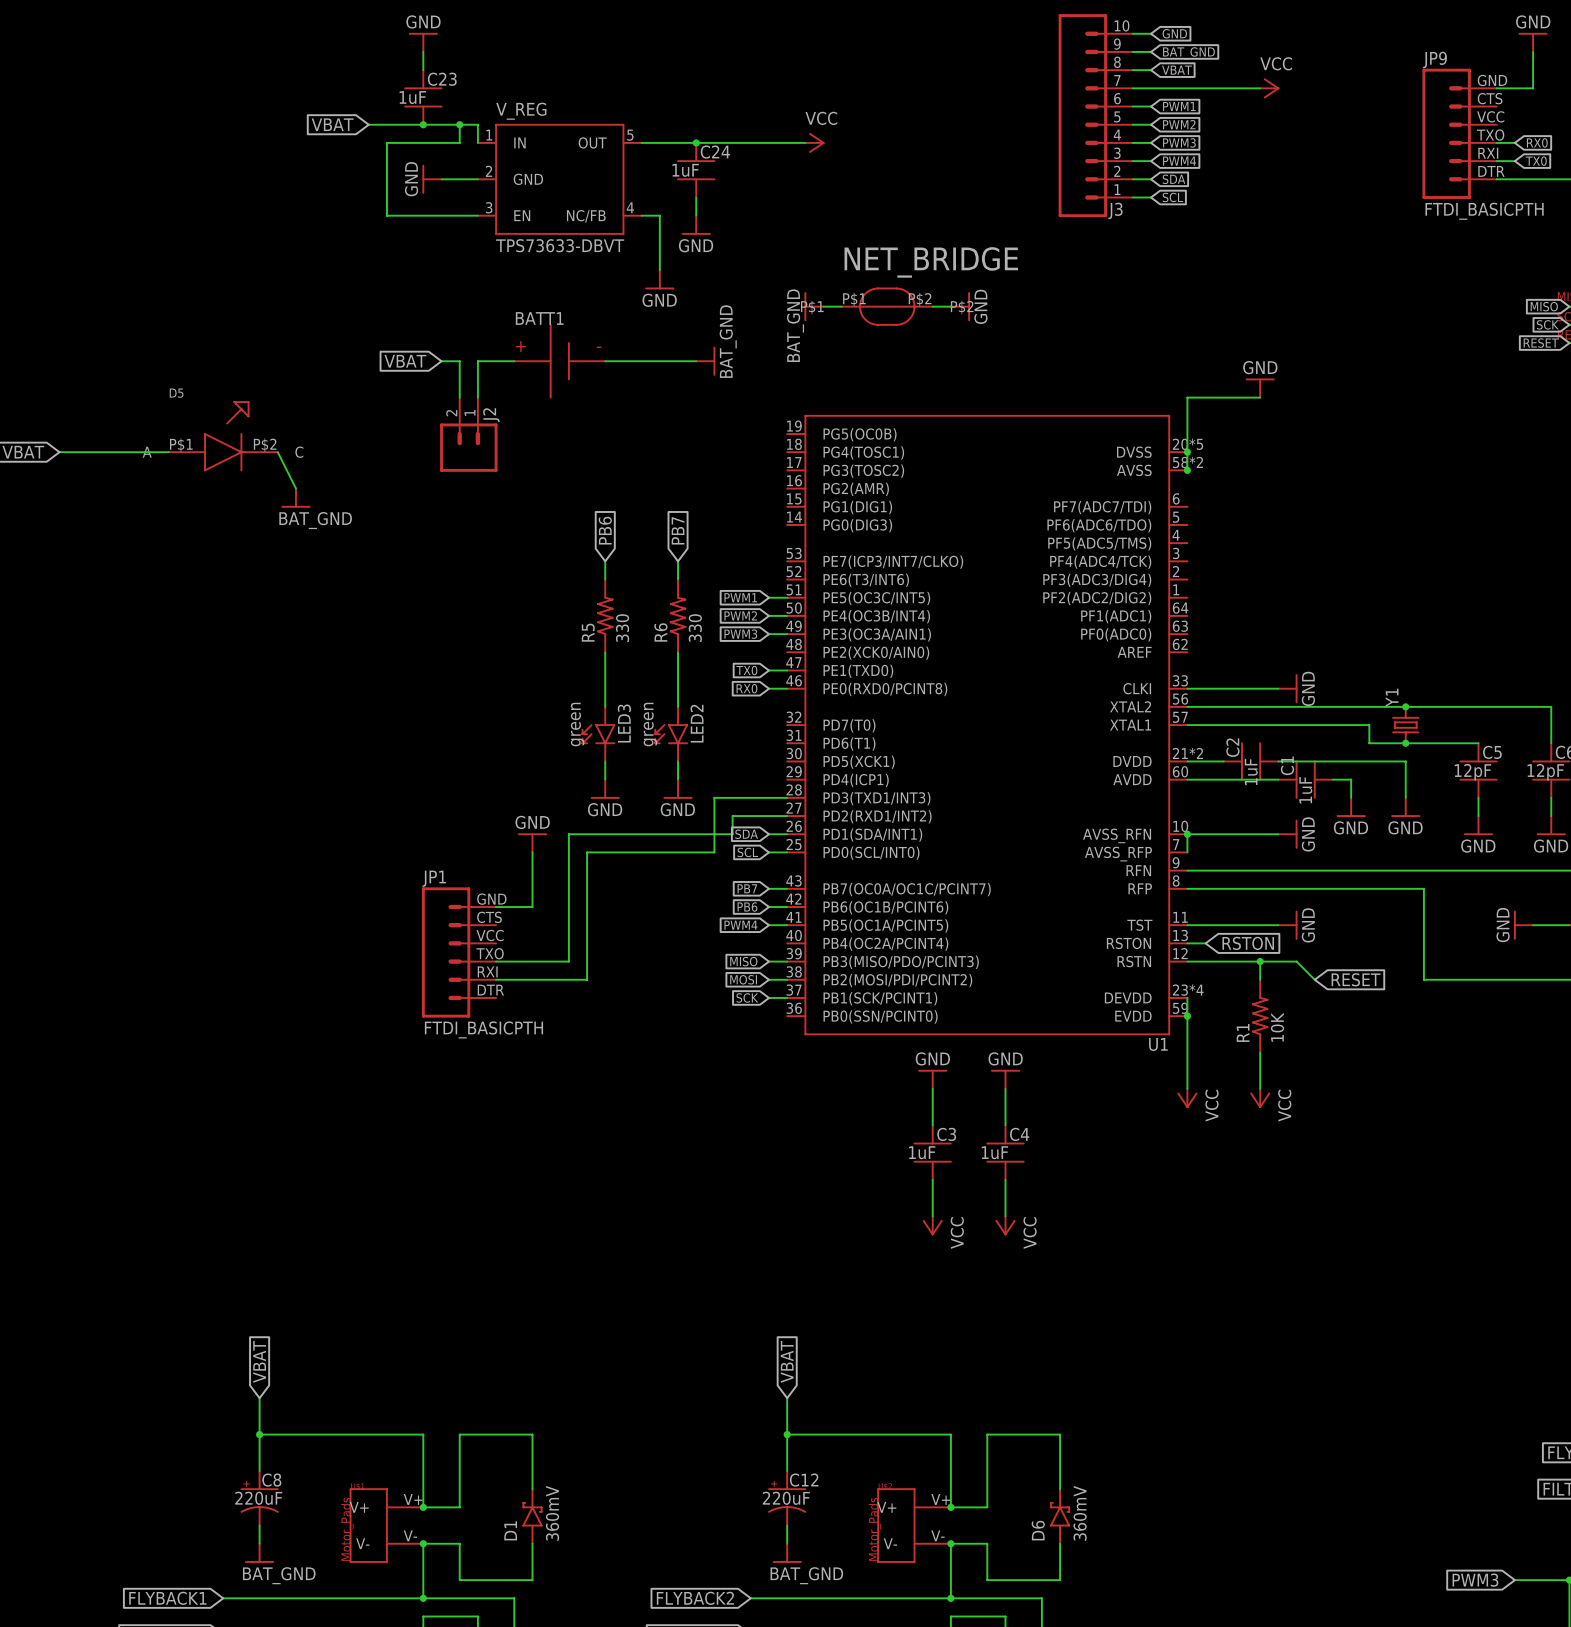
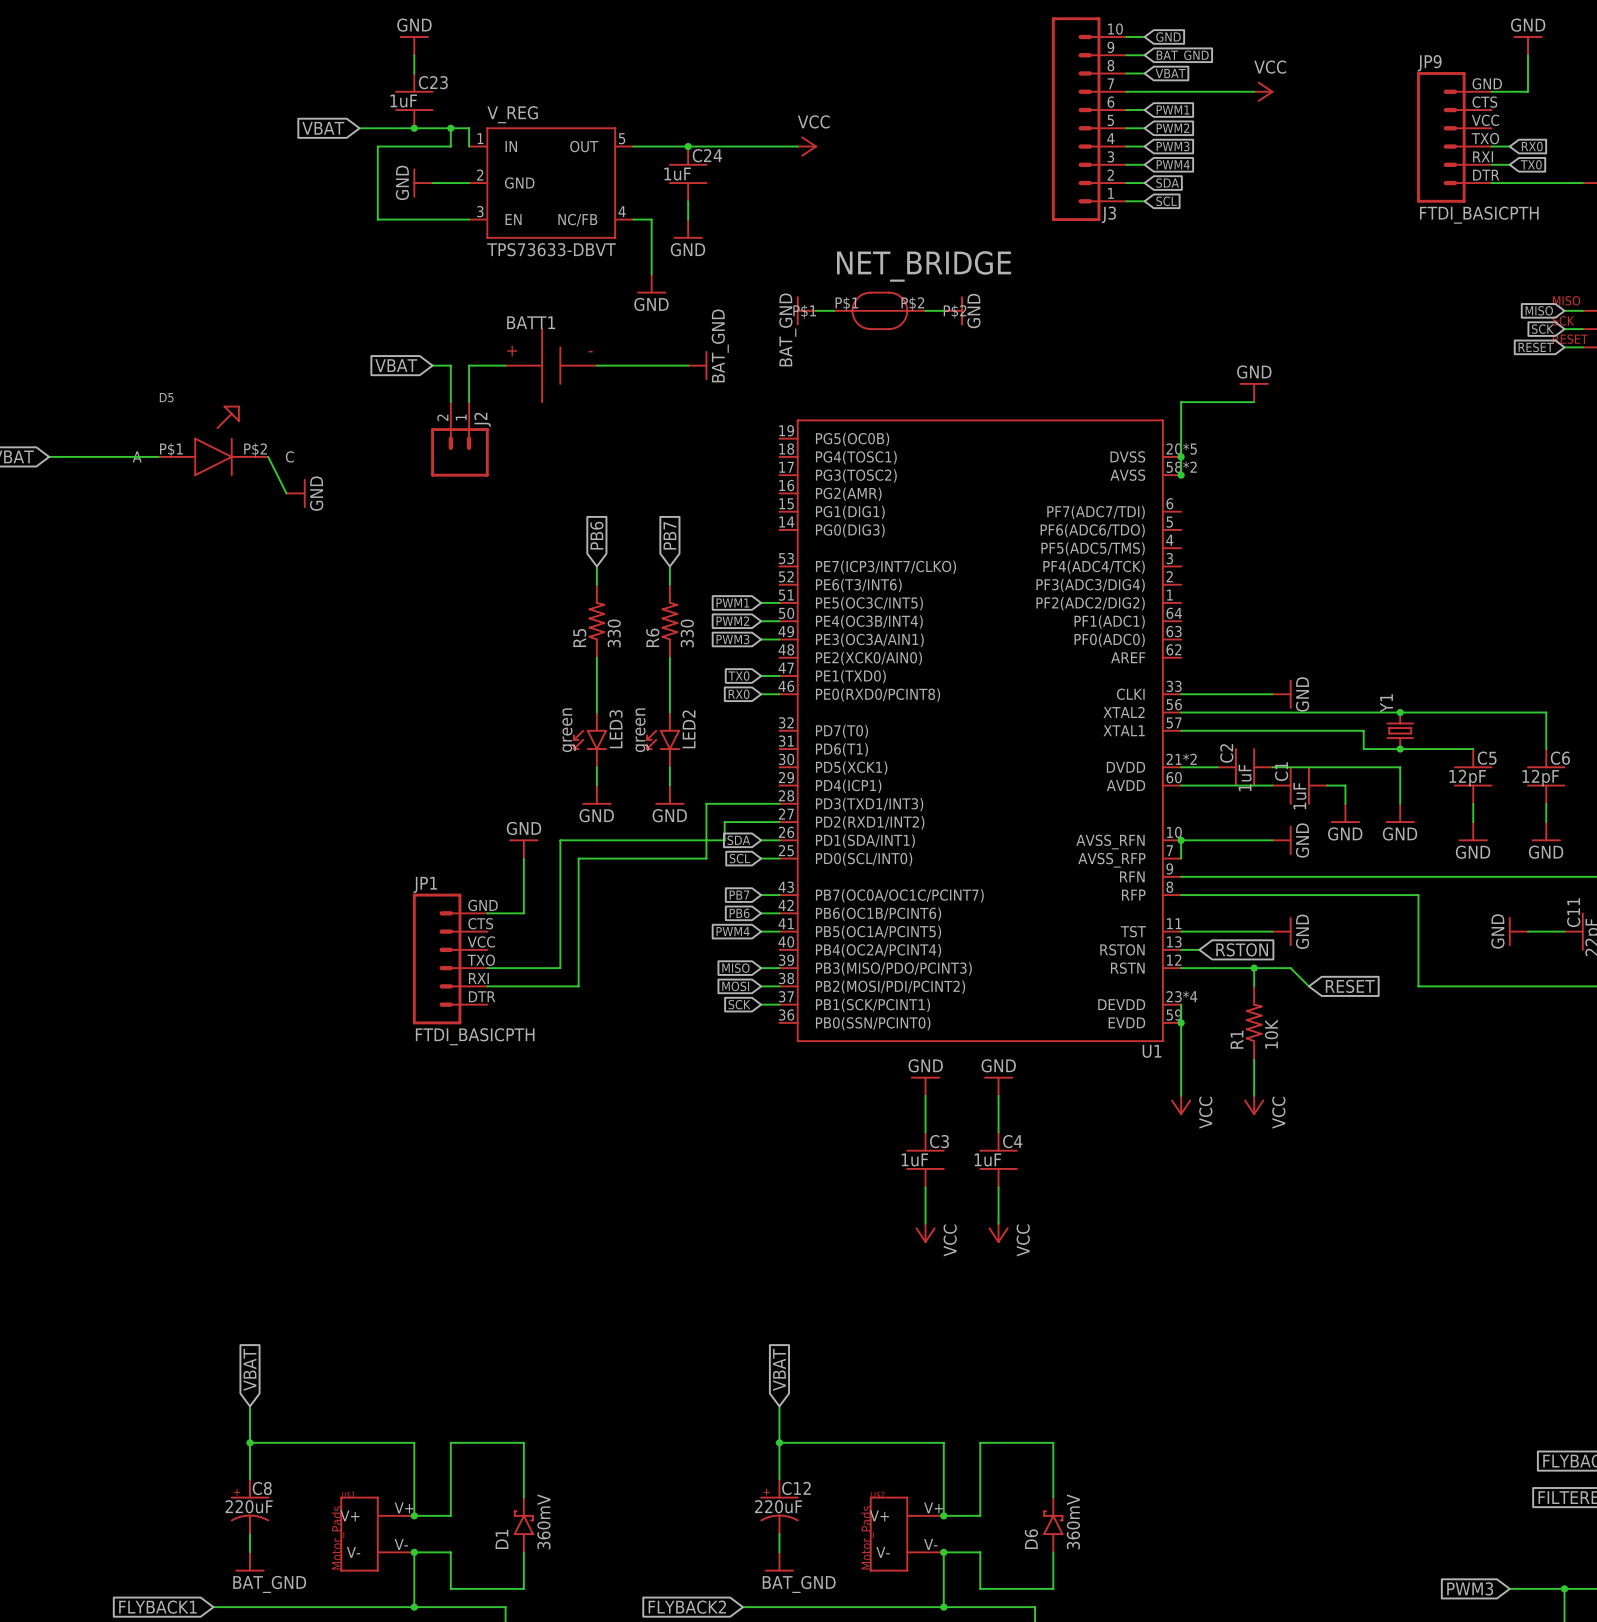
power symbol: none -> GND (296, 493)
power symbol: BAT_GND (295, 498) -> none

